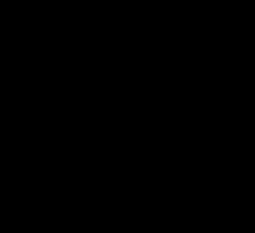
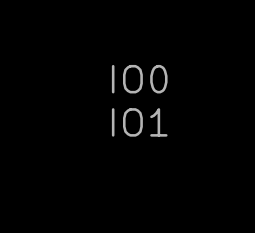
label: none -> IO0 (139, 79)
label: none -> IO1 (139, 122)

